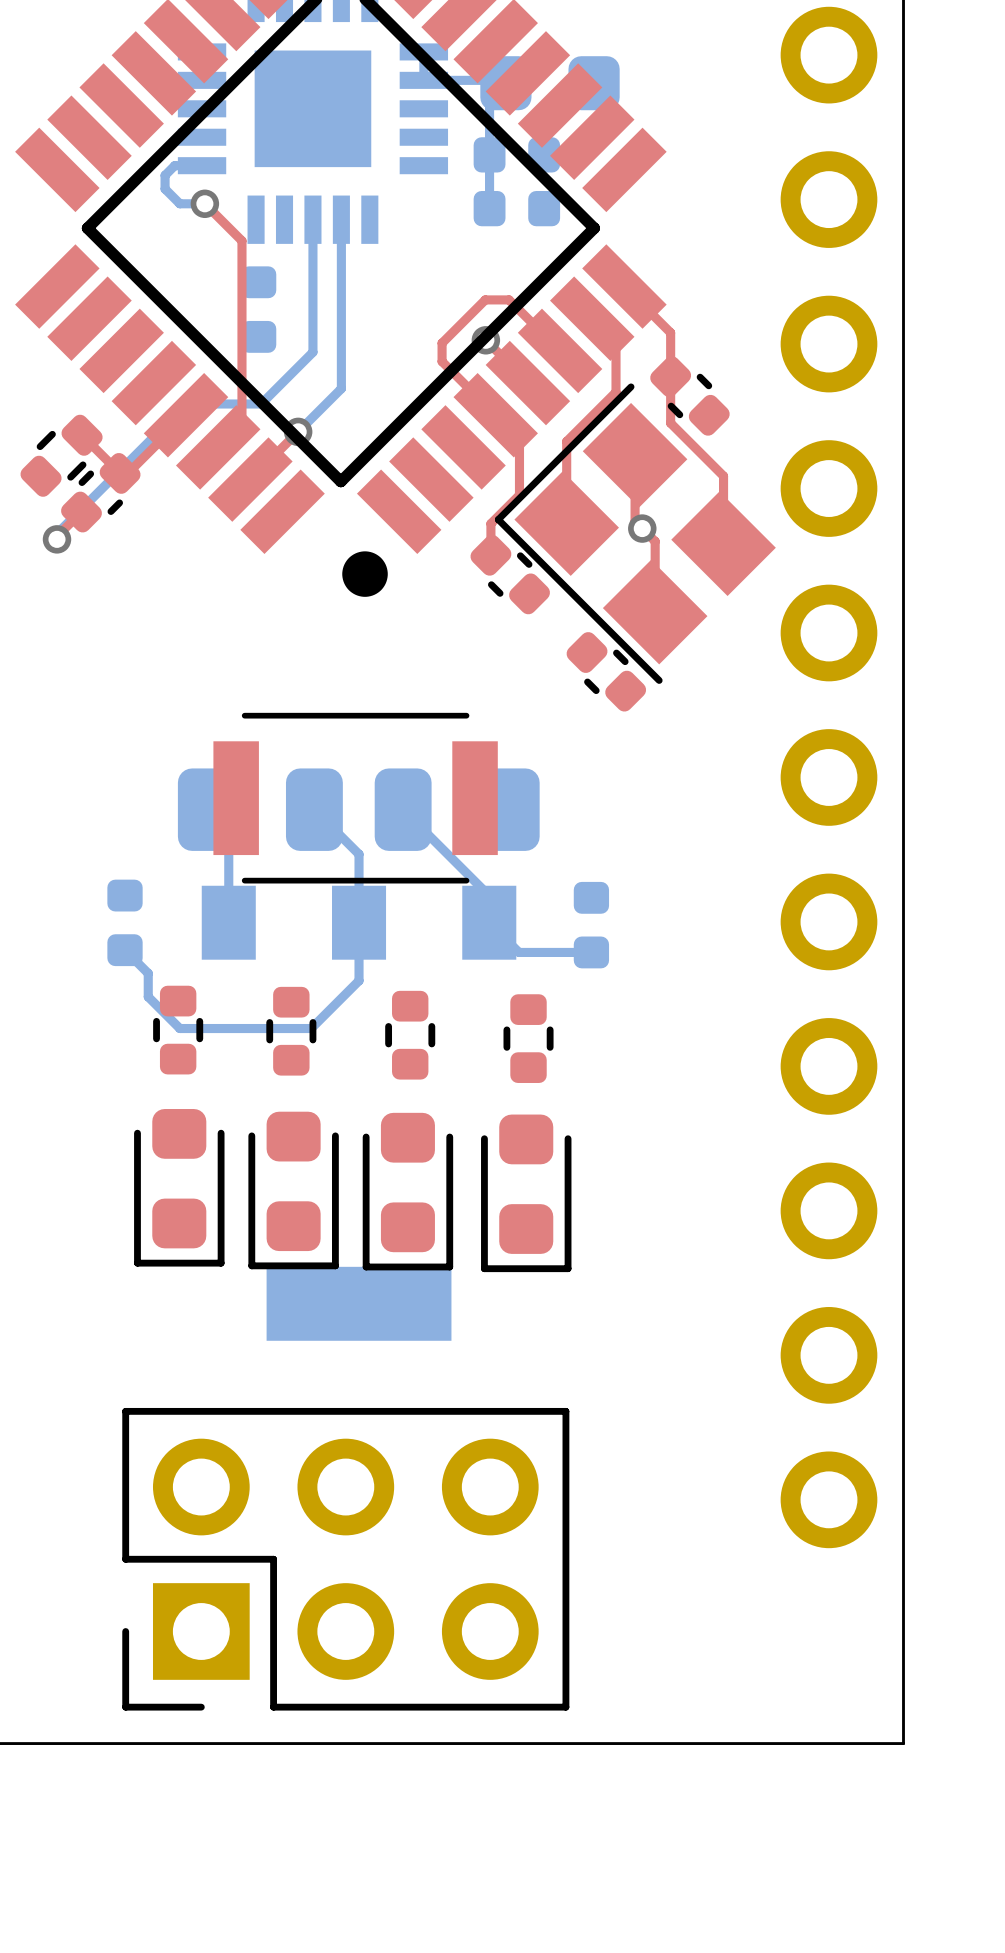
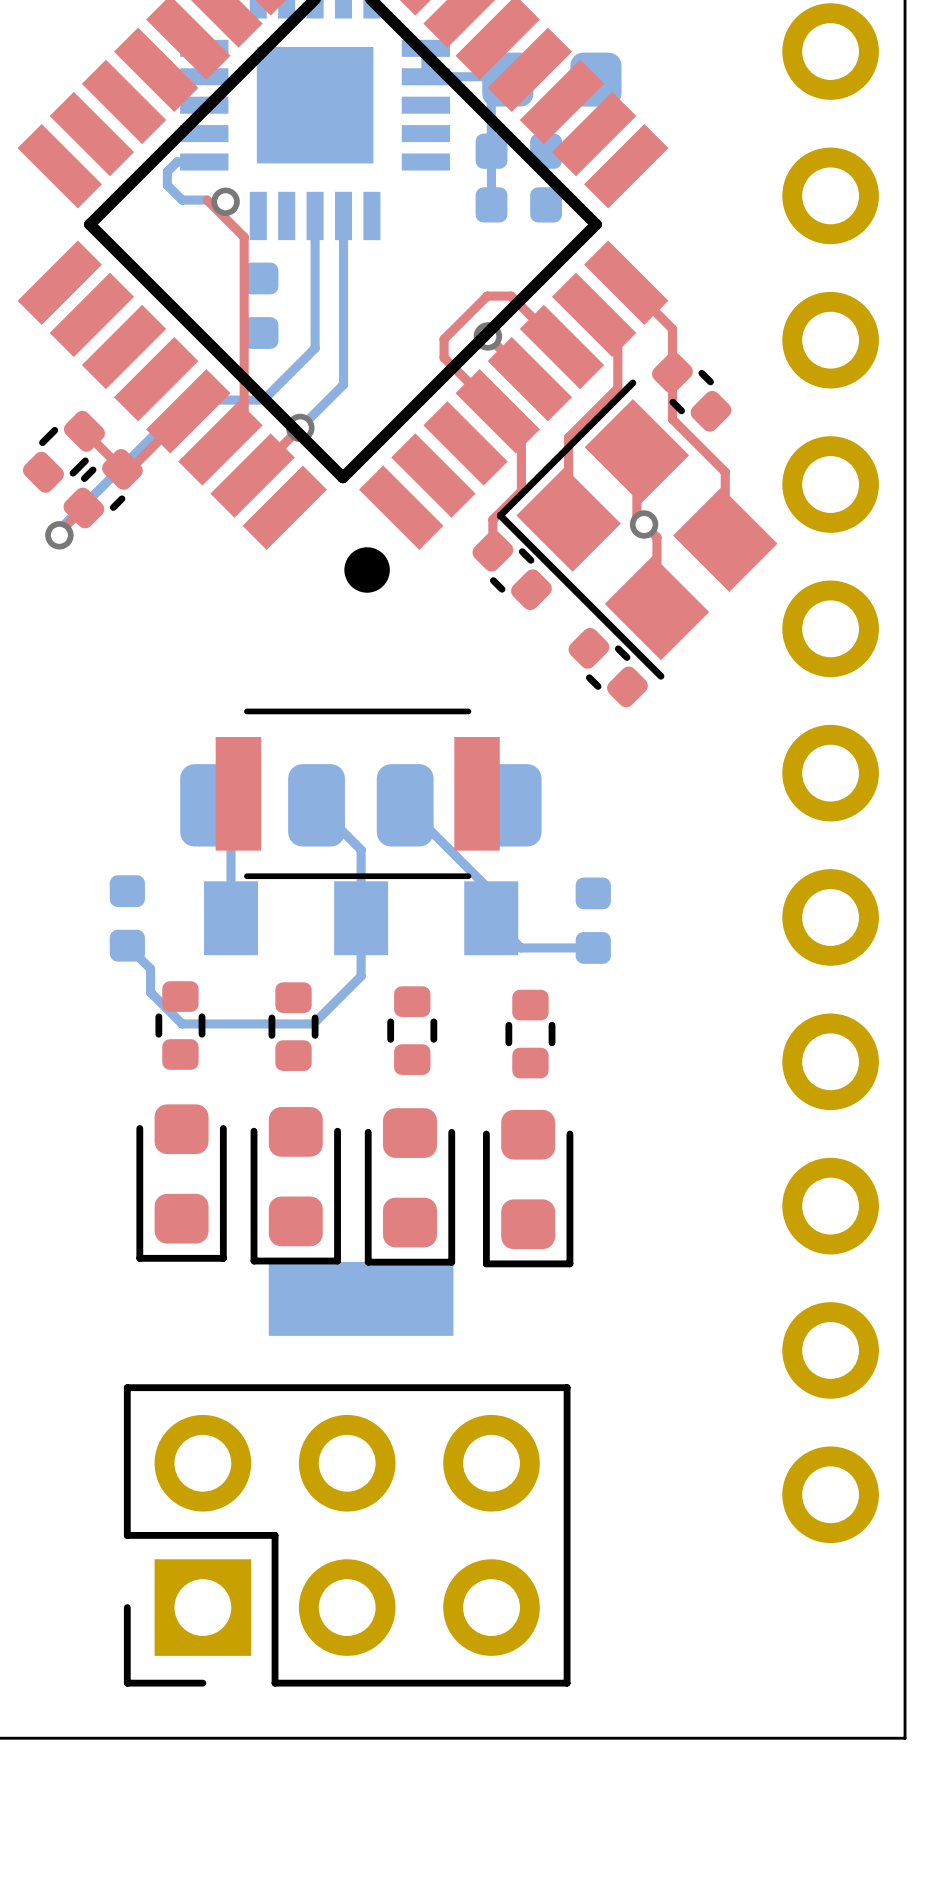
via position: (204, 203) -> (225, 201)
part position: (345, 1559) -> (347, 1535)

